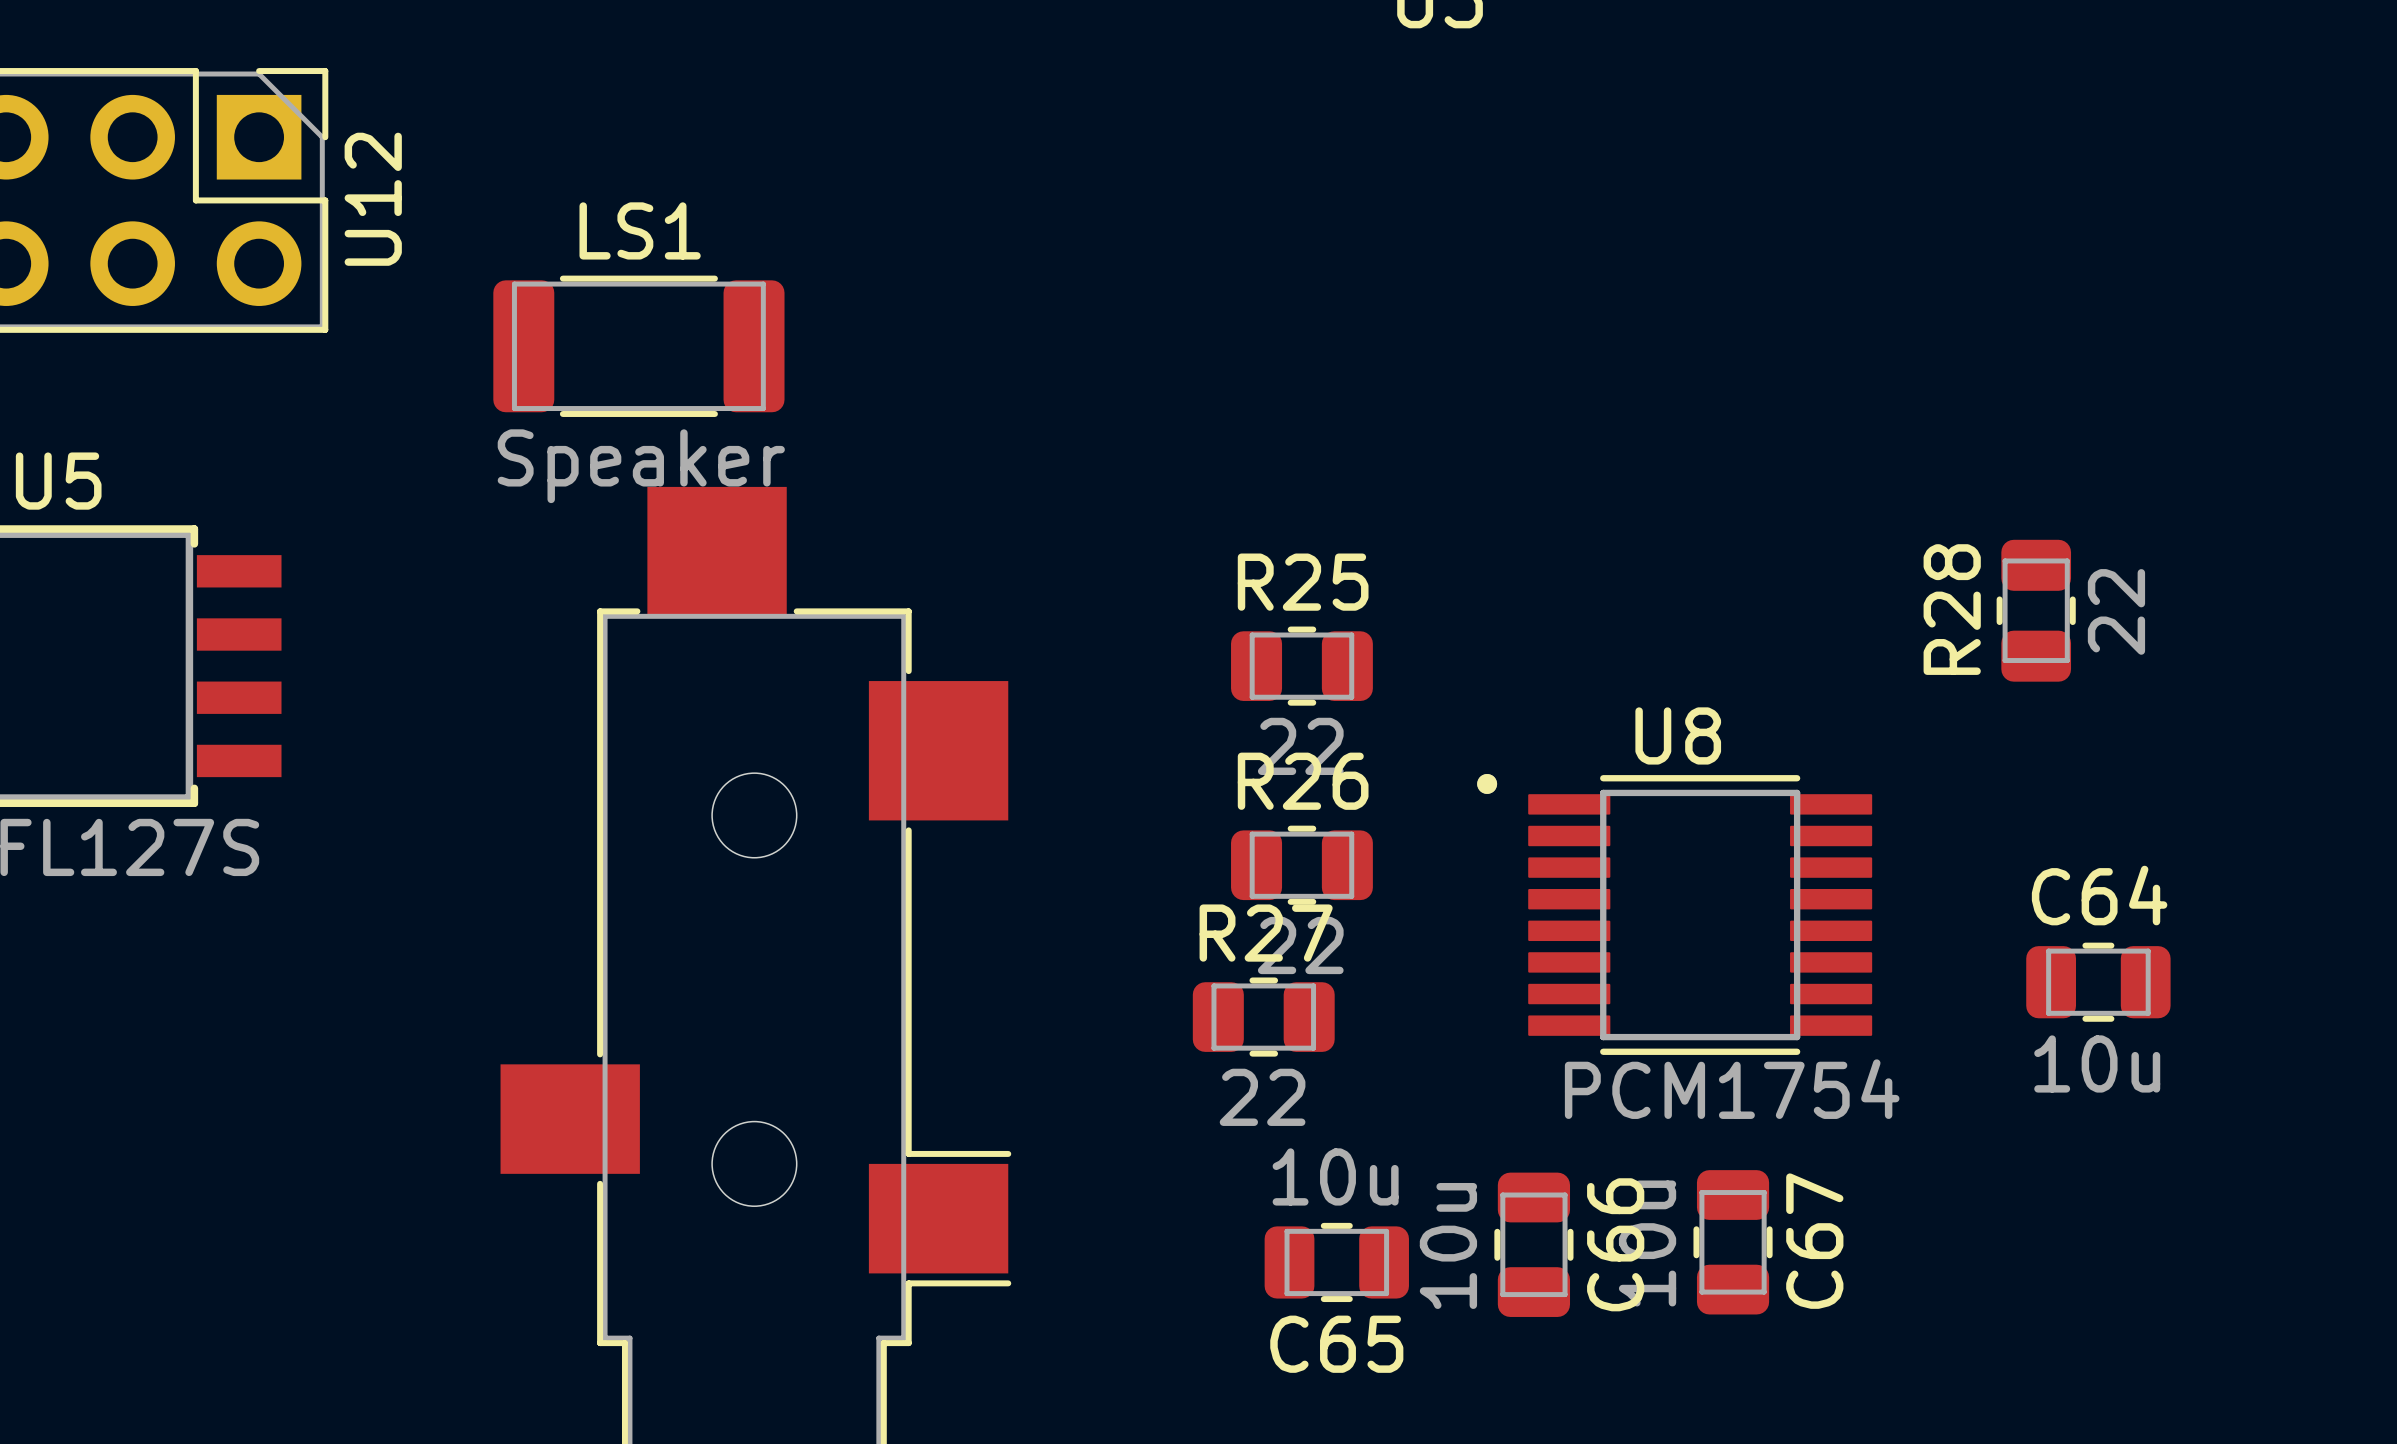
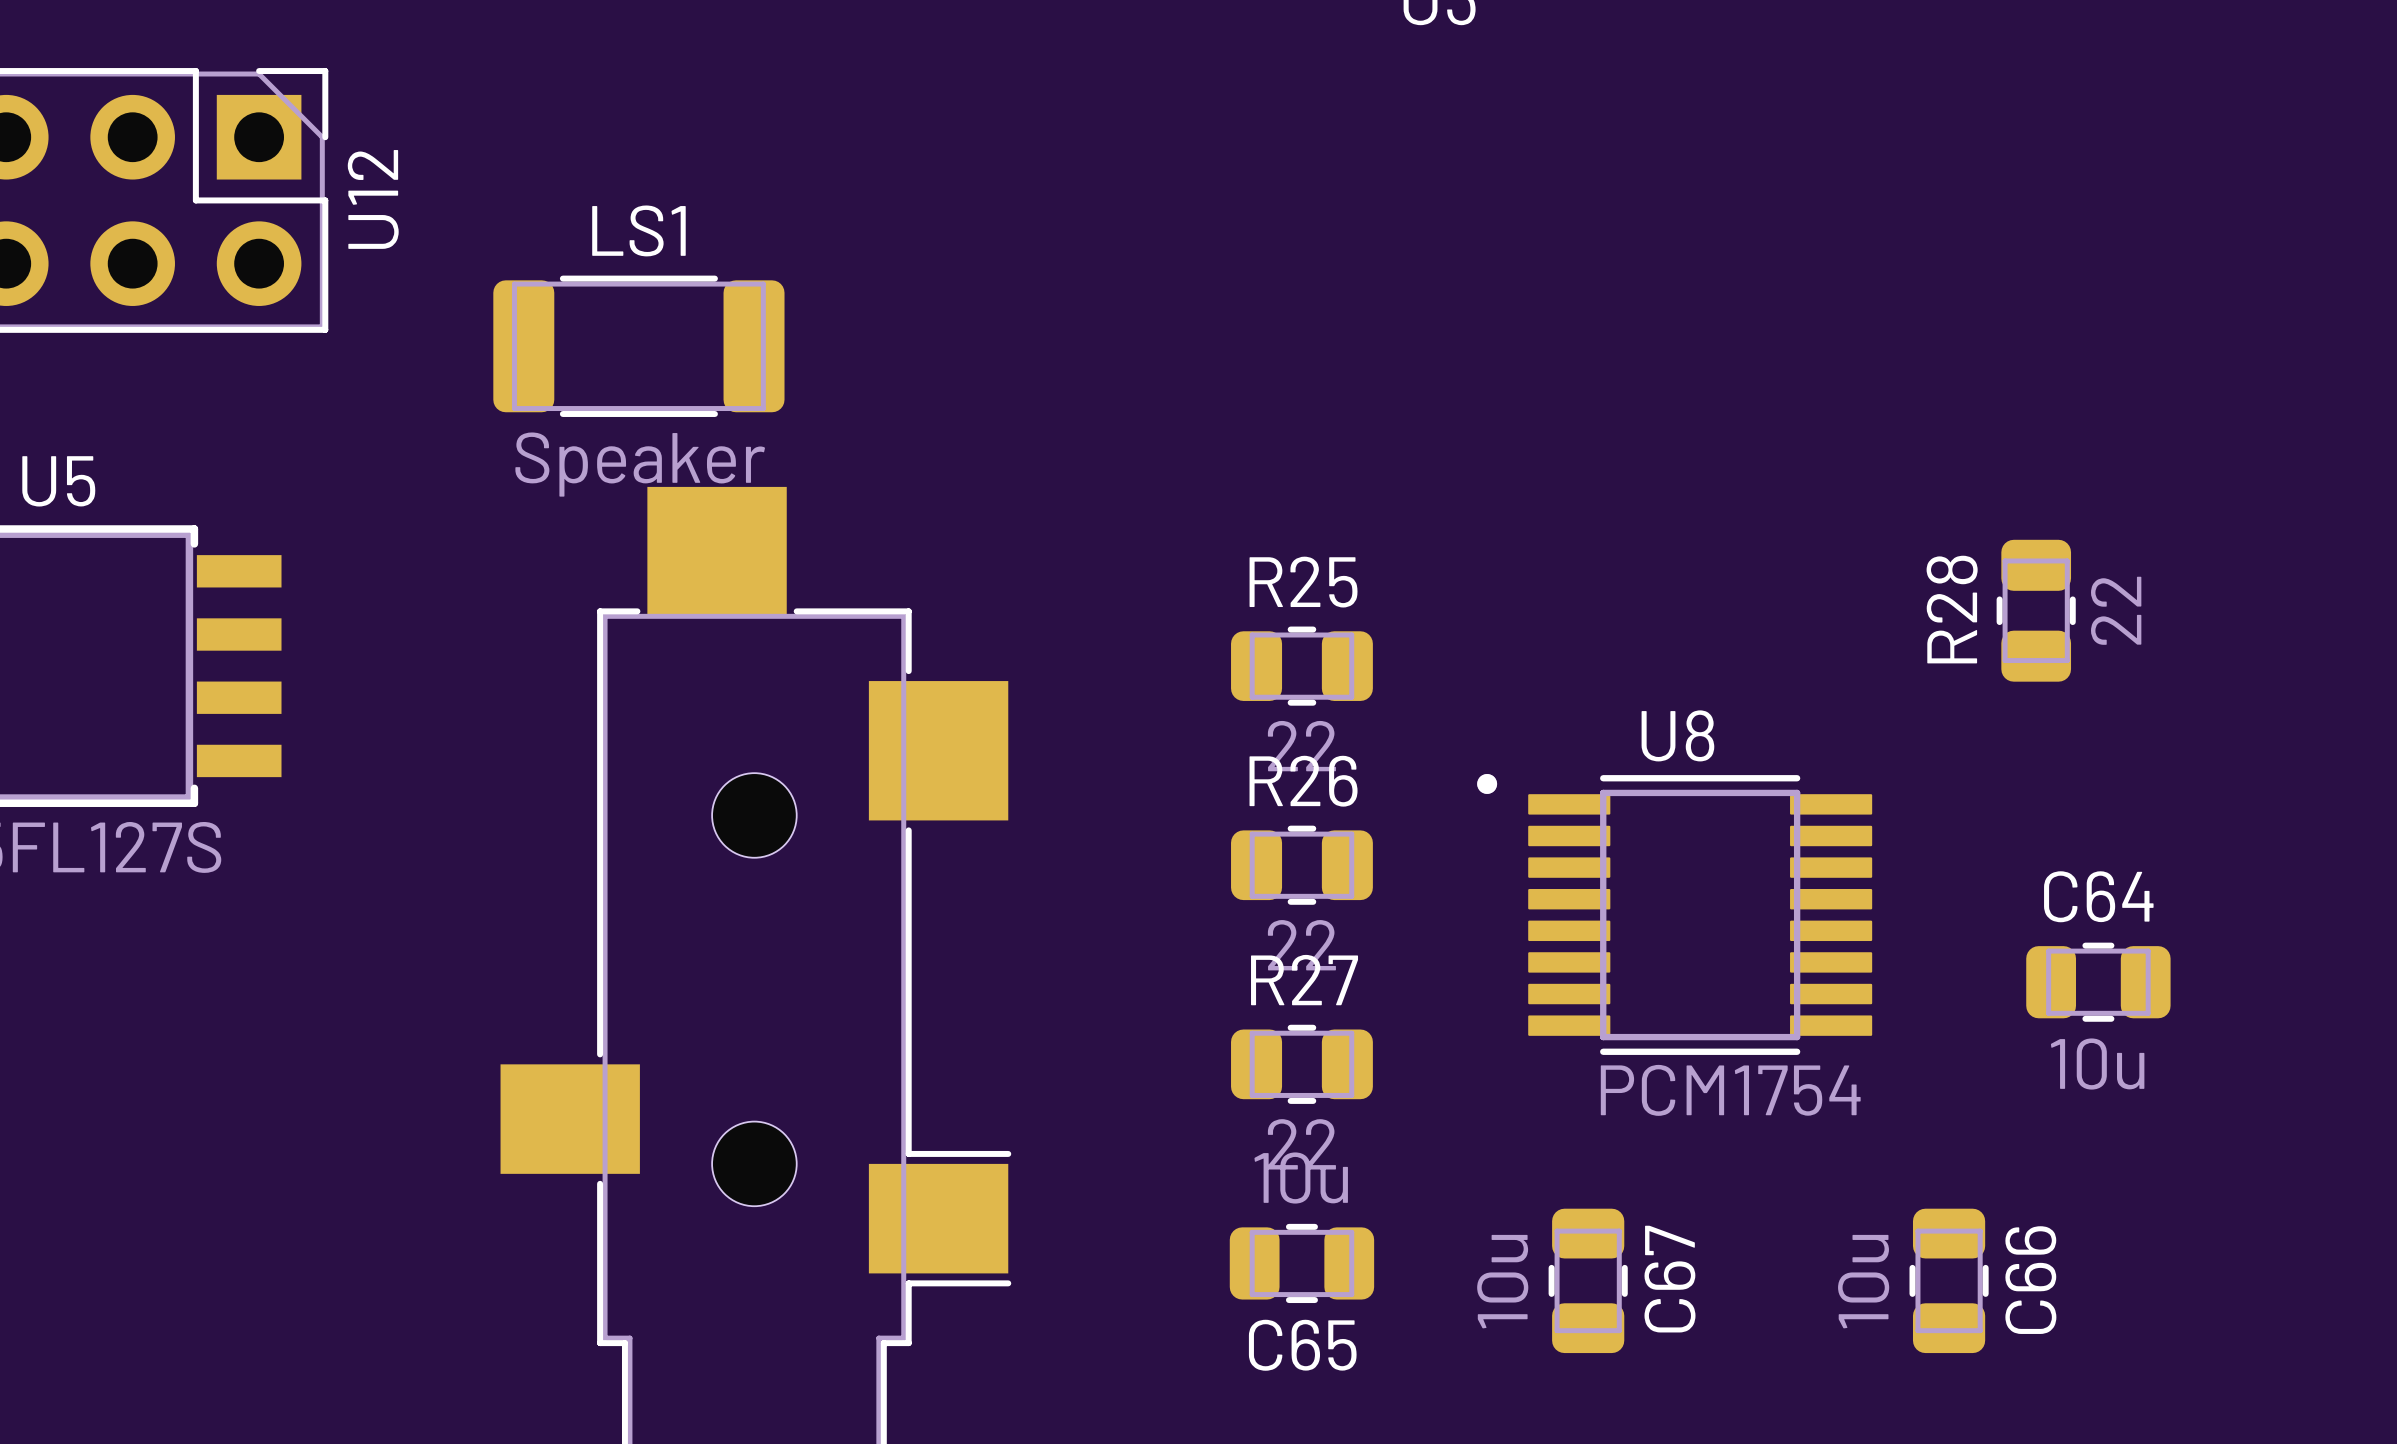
R27 position: (1263, 1017) -> (1301, 1064)
C67 position: (1733, 1242) -> (1588, 1280)
C66 position: (1533, 1244) -> (1949, 1280)
C65 position: (1336, 1262) -> (1301, 1263)

